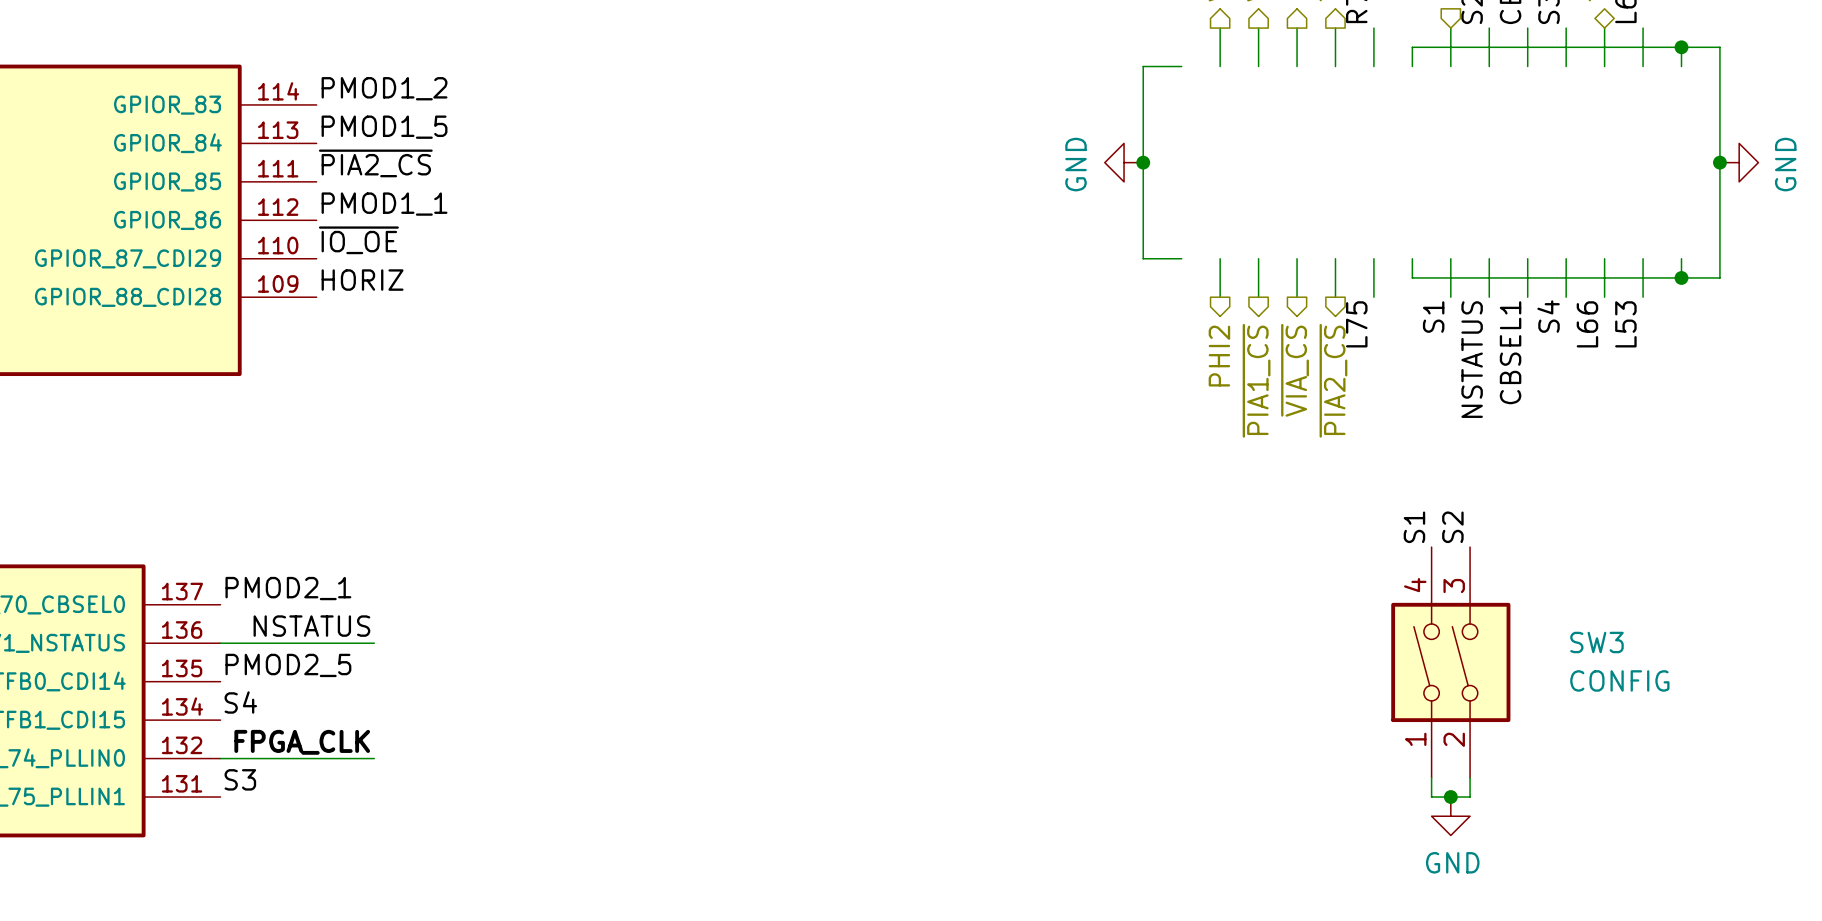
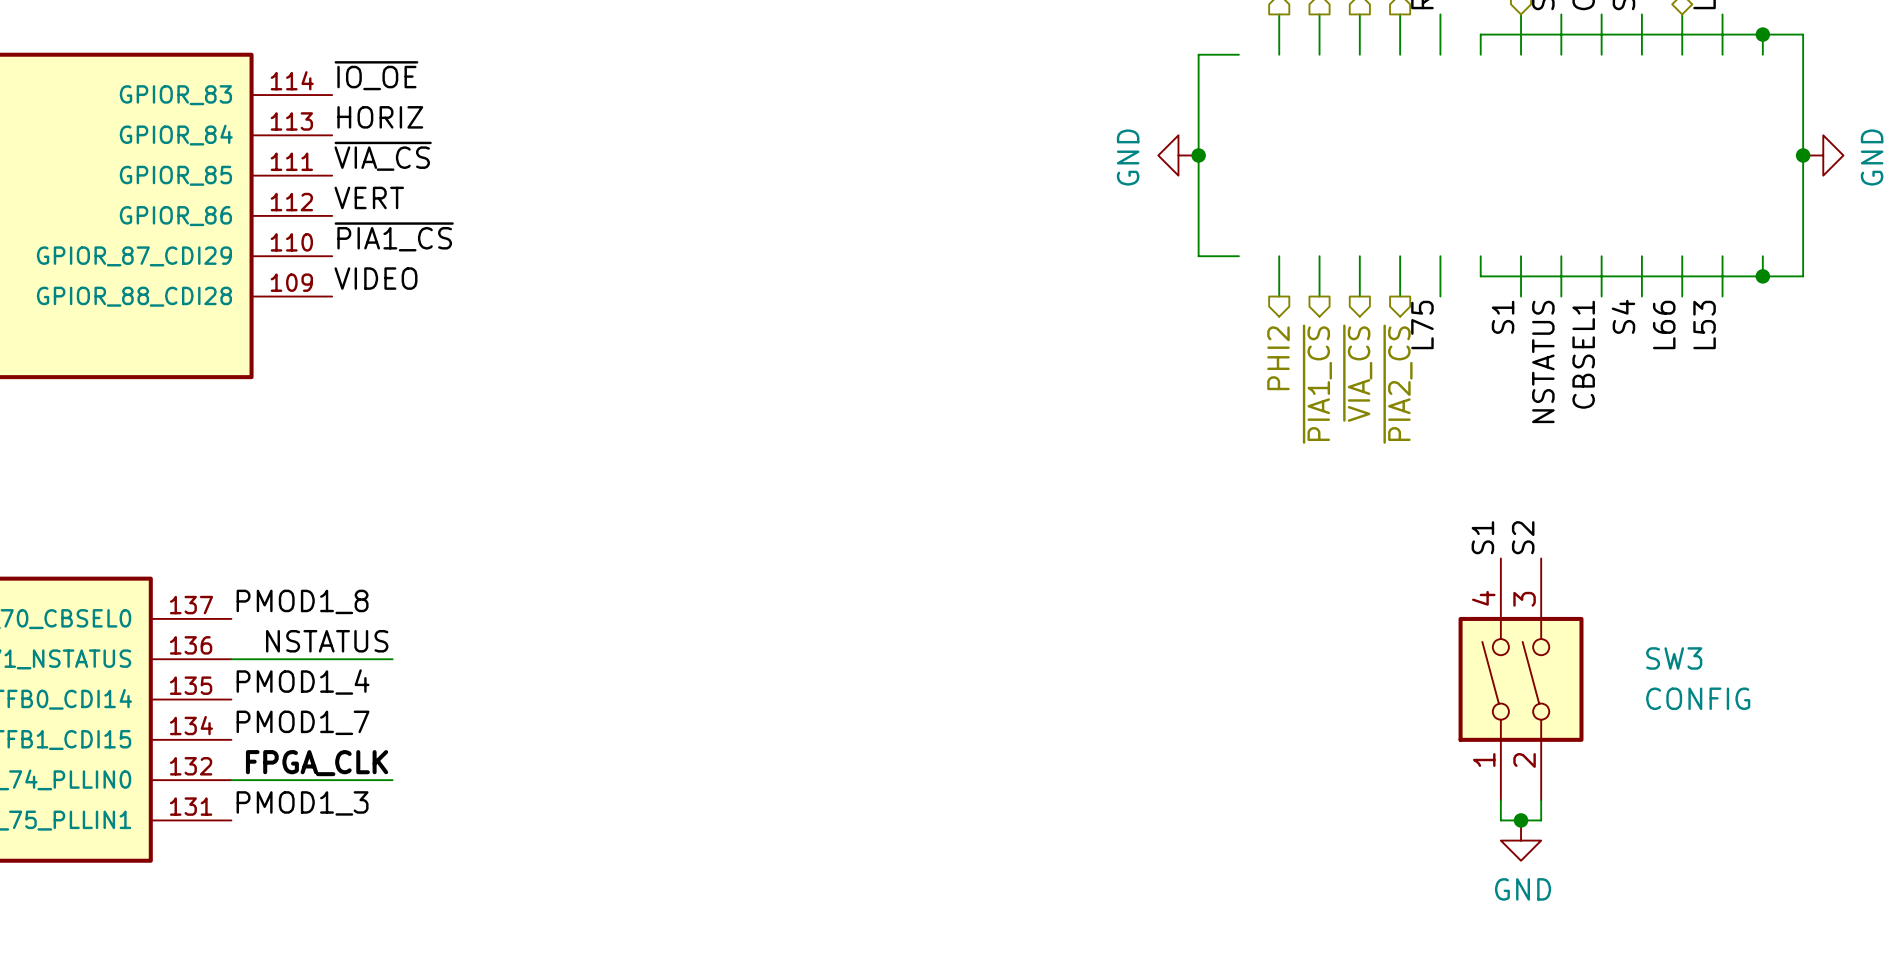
label: PMOD1_2 (384, 88) -> ~{IO_OE} (376, 75)
label: PMOD1_5 (384, 127) -> HORIZ (380, 117)
label: ~{PIA2_CS} (375, 163) -> ~{VIA_CS} (383, 156)
label: PMOD1_1 (384, 204) -> VERT (369, 197)
label: ~{IO_OE} (358, 240) -> ~{PIA1_CS} (394, 236)
label: HORIZ (362, 280) -> VIDEO (375, 278)
label: PMOD2_1 (288, 588) -> PMOD1_8 (302, 601)
label: PMOD2_5 (288, 665) -> PMOD1_4 (303, 682)
label: S4 (240, 702) -> PMOD1_7 (303, 722)
label: S3 (240, 779) -> PMOD1_3 (302, 803)

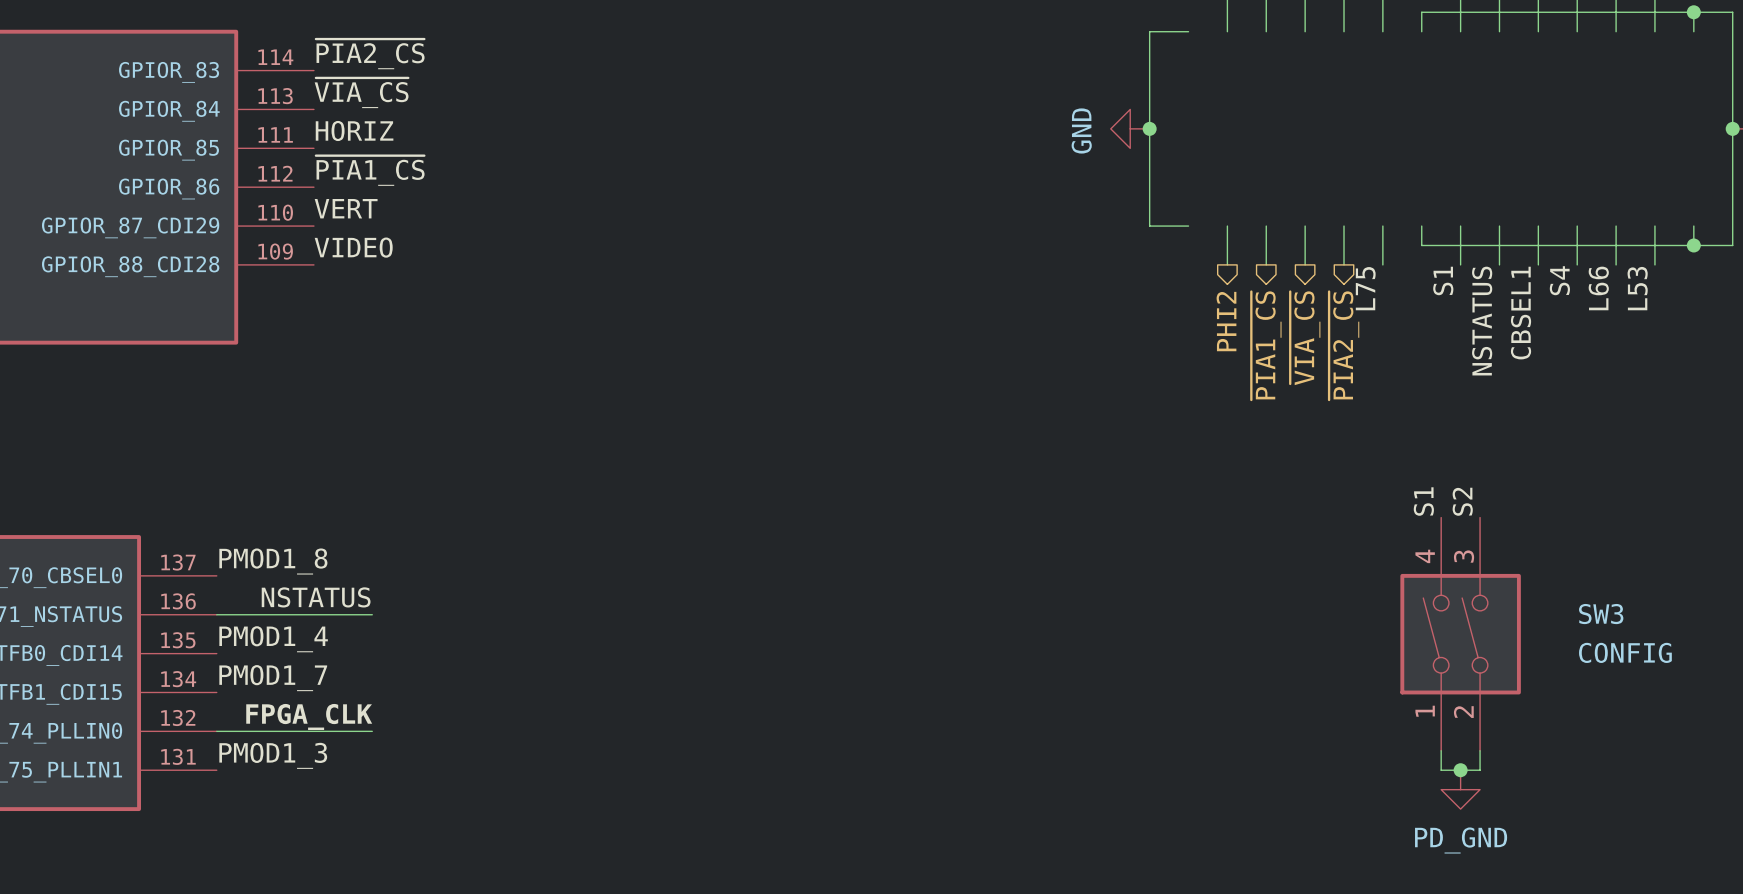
label: ~{IO_OE} (376, 75) -> ~{PIA2_CS} (370, 54)
label: HORIZ (380, 117) -> ~{VIA_CS} (361, 93)
label: ~{VIA_CS} (383, 156) -> HORIZ (354, 130)
label: VERT (369, 197) -> ~{PIA1_CS} (370, 170)
label: ~{PIA1_CS} (394, 236) -> VERT (346, 208)
power symbol: GND (1521, 840) -> PD_GND (1460, 789)

